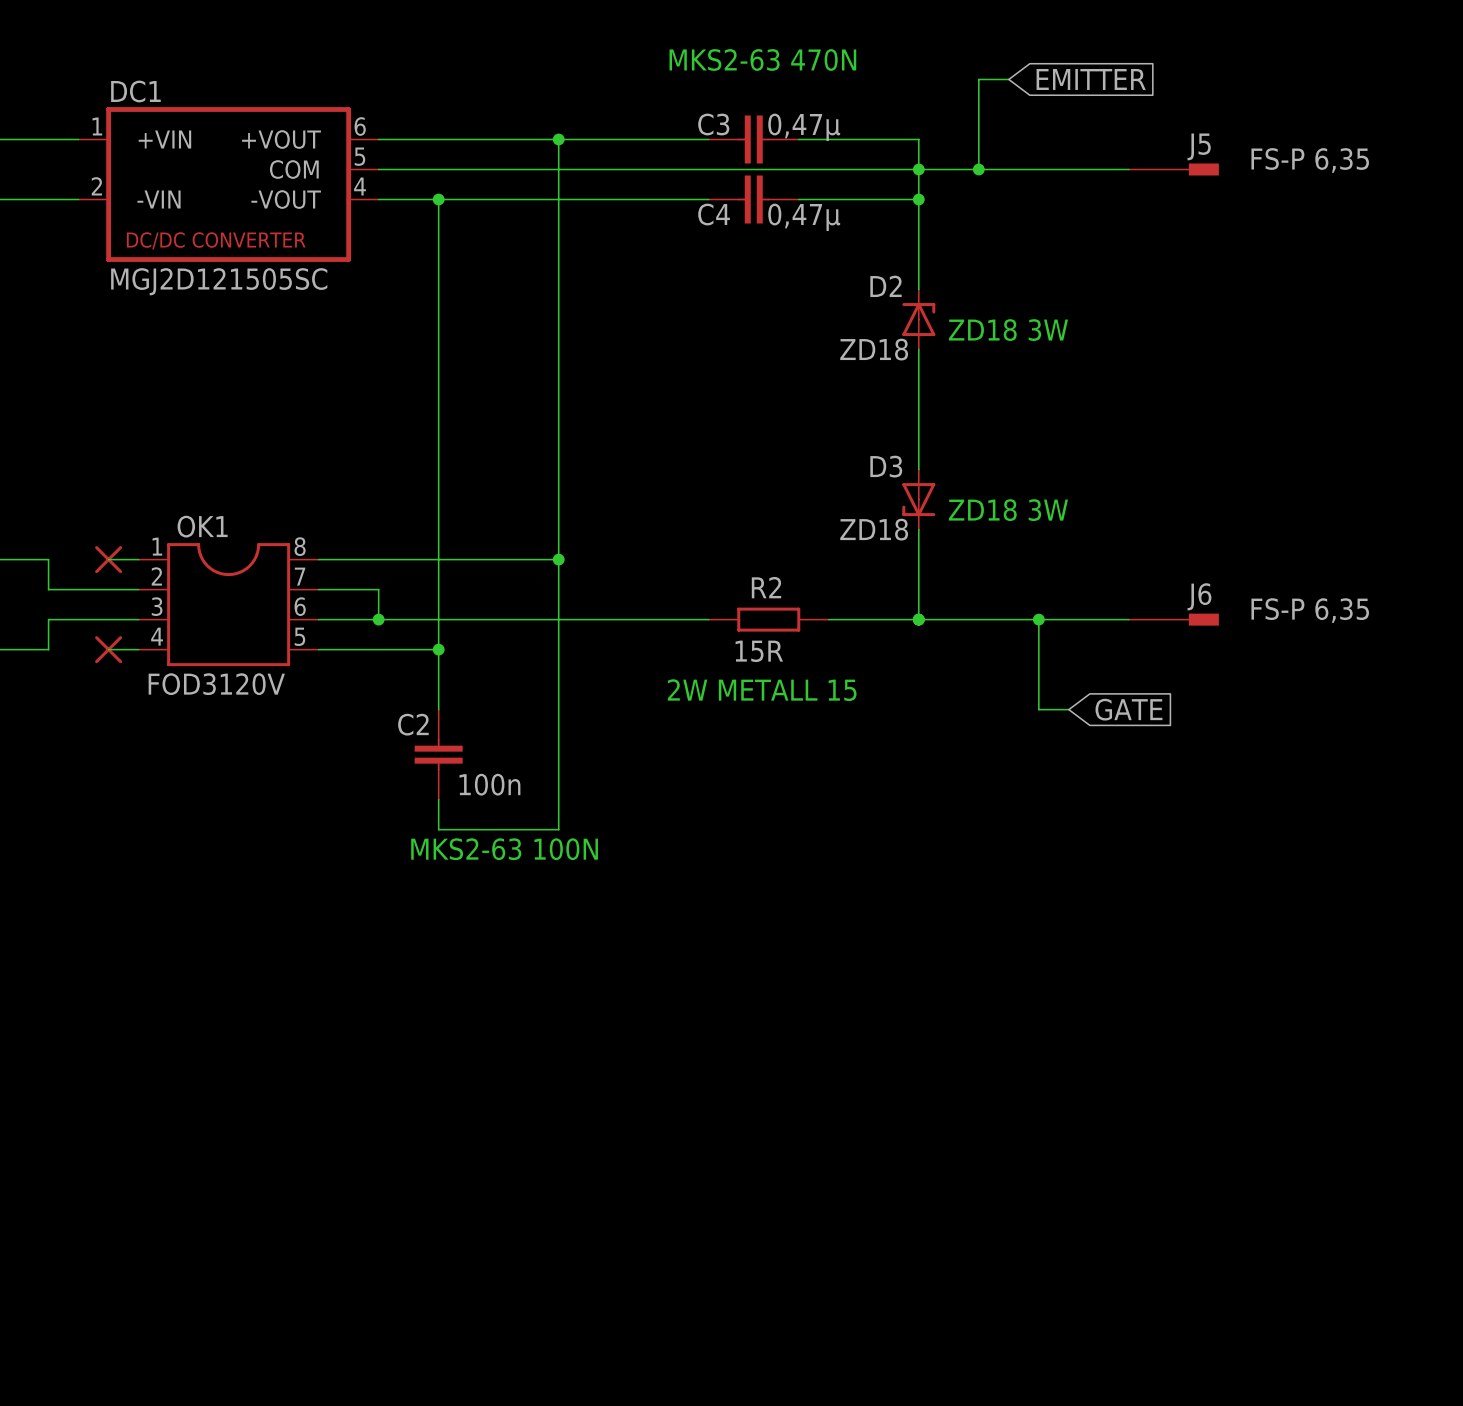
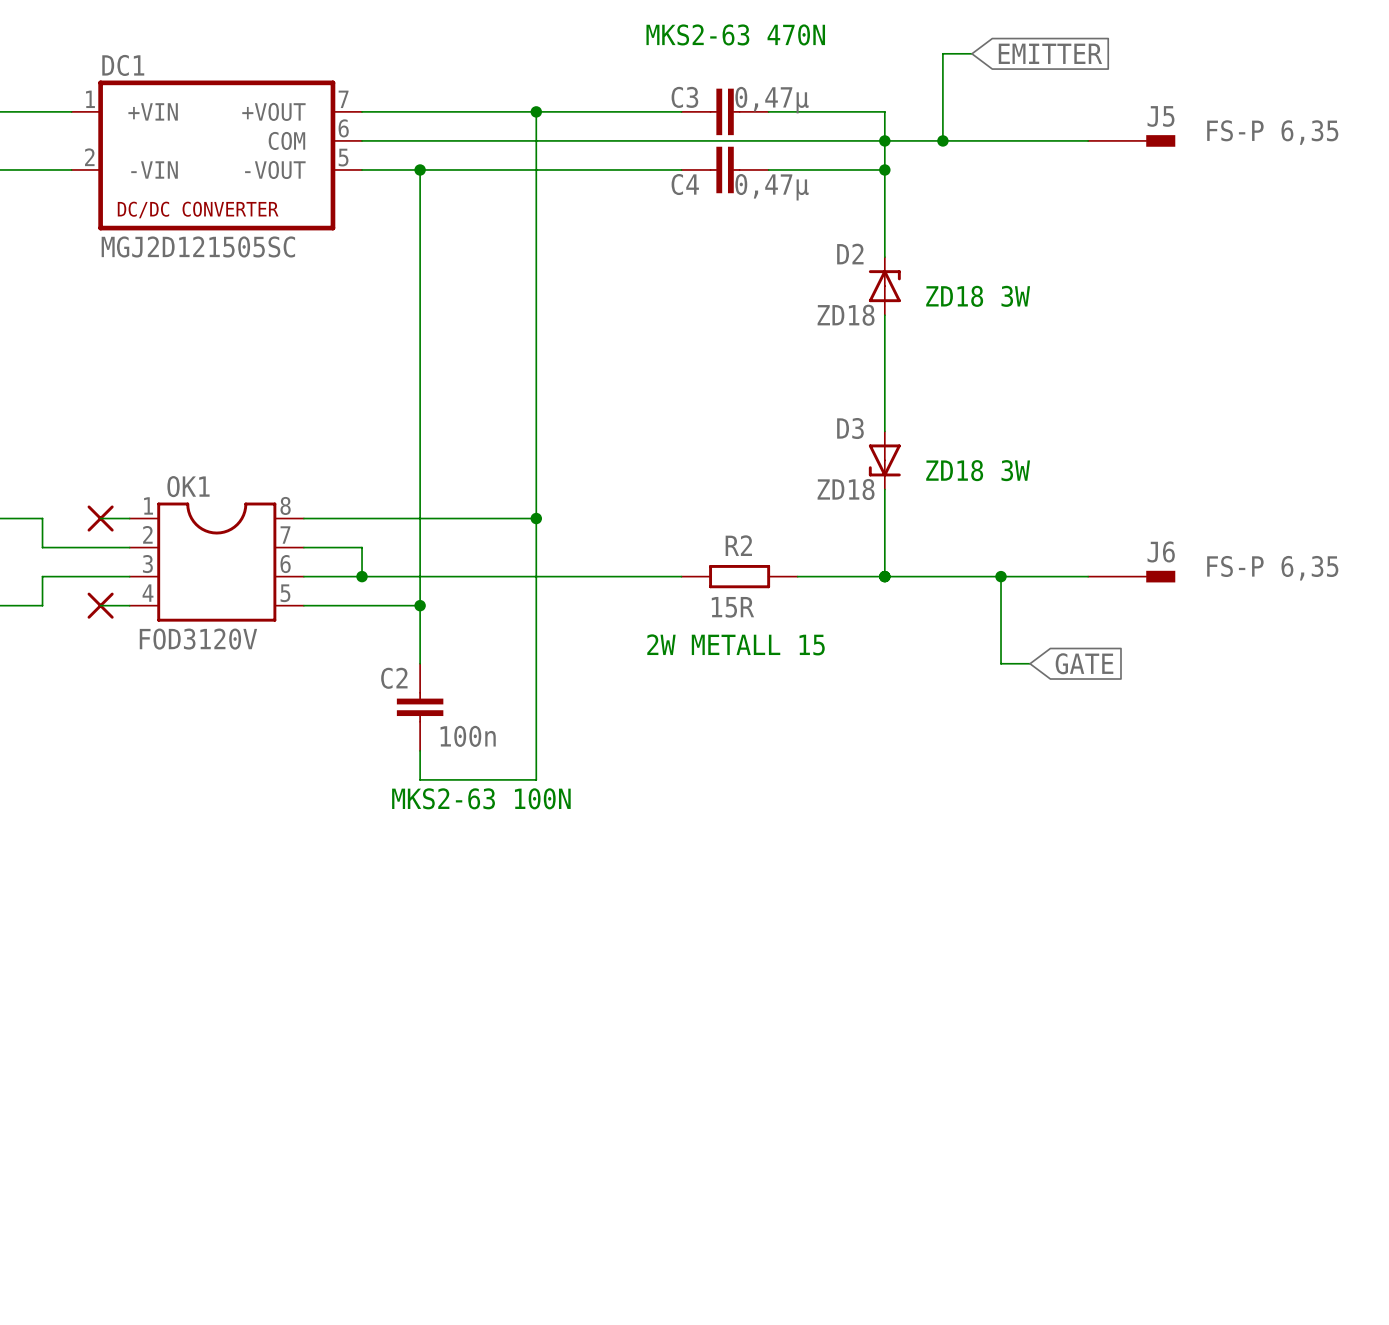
DC1 pin number: 6 (360, 126) -> 7 (343, 99)
DC1 pin number: 5 (359, 156) -> 6 (343, 128)
DC1 pin number: 4 (360, 186) -> 5 (343, 157)

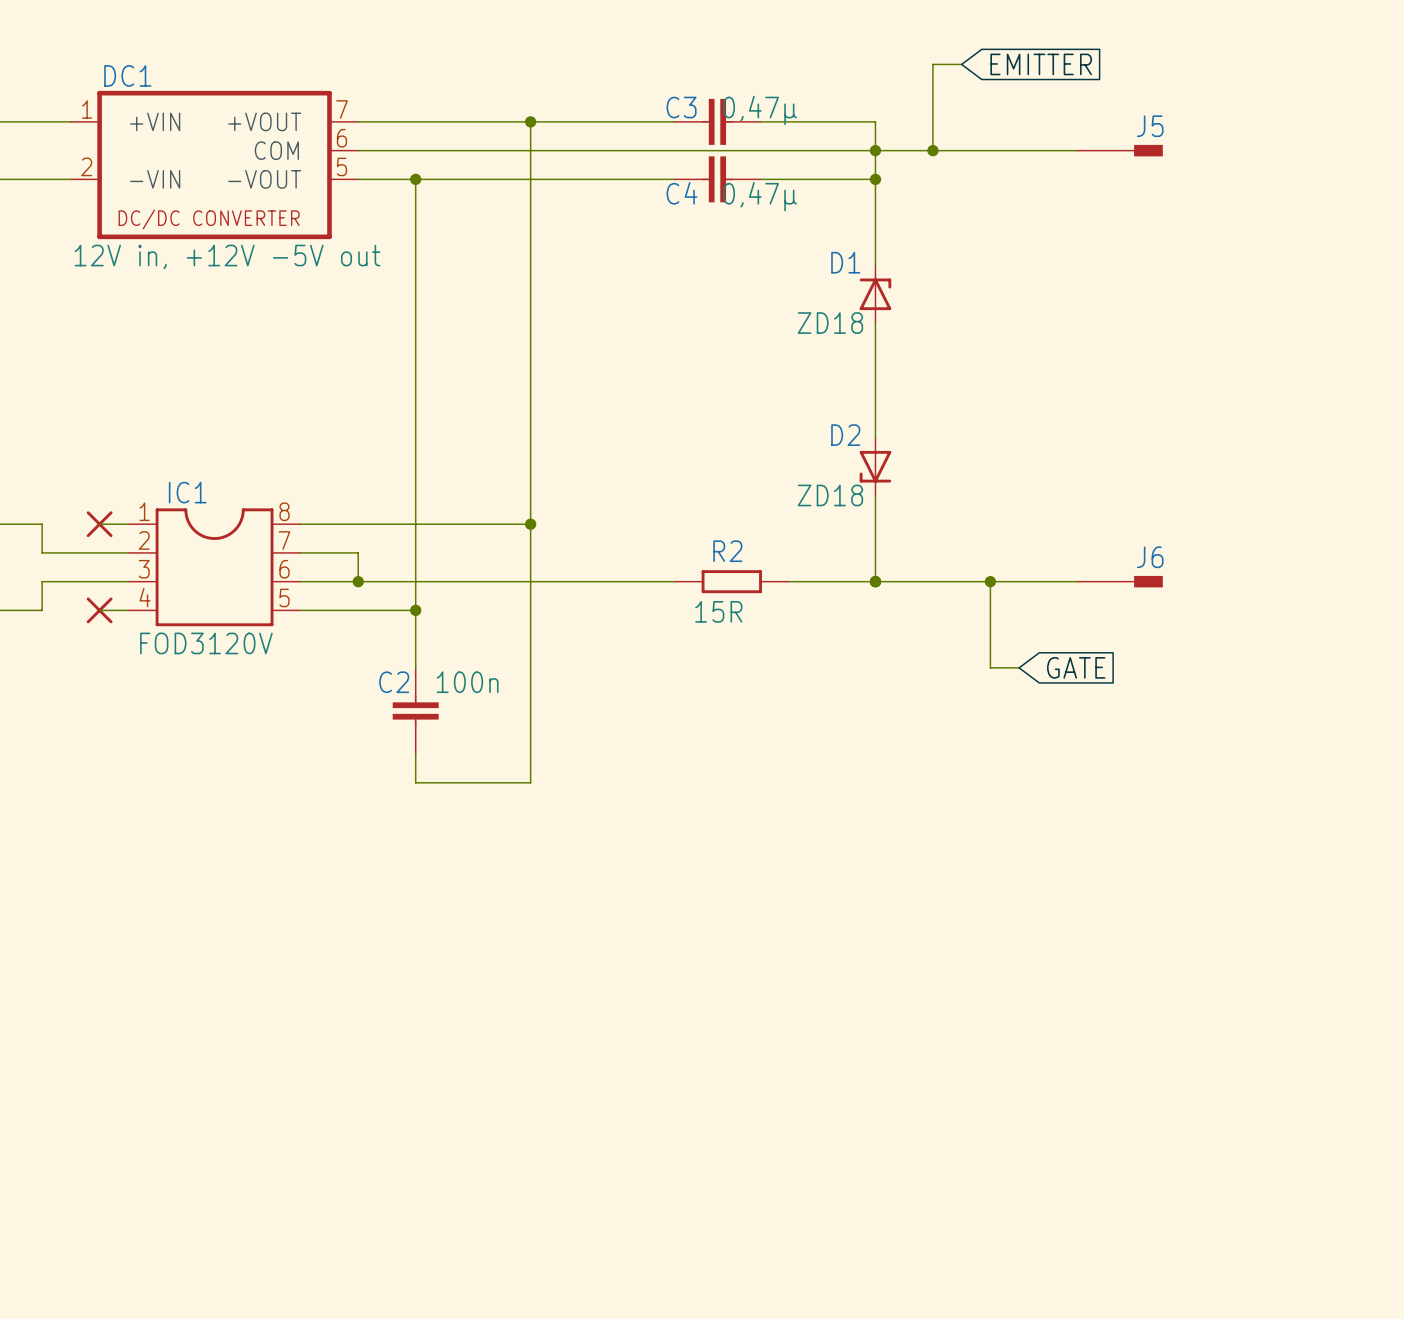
text: MKS2-63 470N (735, 34) -> none
J5 value: FS-P 6,35 (1272, 132) -> none
DC1 value: MGJ2D121505SC (198, 246) -> 12V in, +12V -5V out (227, 256)
D2 name: D2 (850, 254) -> D1 (845, 262)
text: ZD18 3W (978, 296) -> none
D3 name: D3 (850, 428) -> D2 (845, 435)
text: ZD18 3W (978, 470) -> none
OK1 name: OK1 (188, 486) -> IC1 (187, 492)
J6 value: FS-P 6,35 (1272, 568) -> none
text: 2W METALL 15 (736, 644) -> none
C2 value position: 100n (468, 736) -> 100n (467, 682)
text: MKS2-63 100N (481, 798) -> none

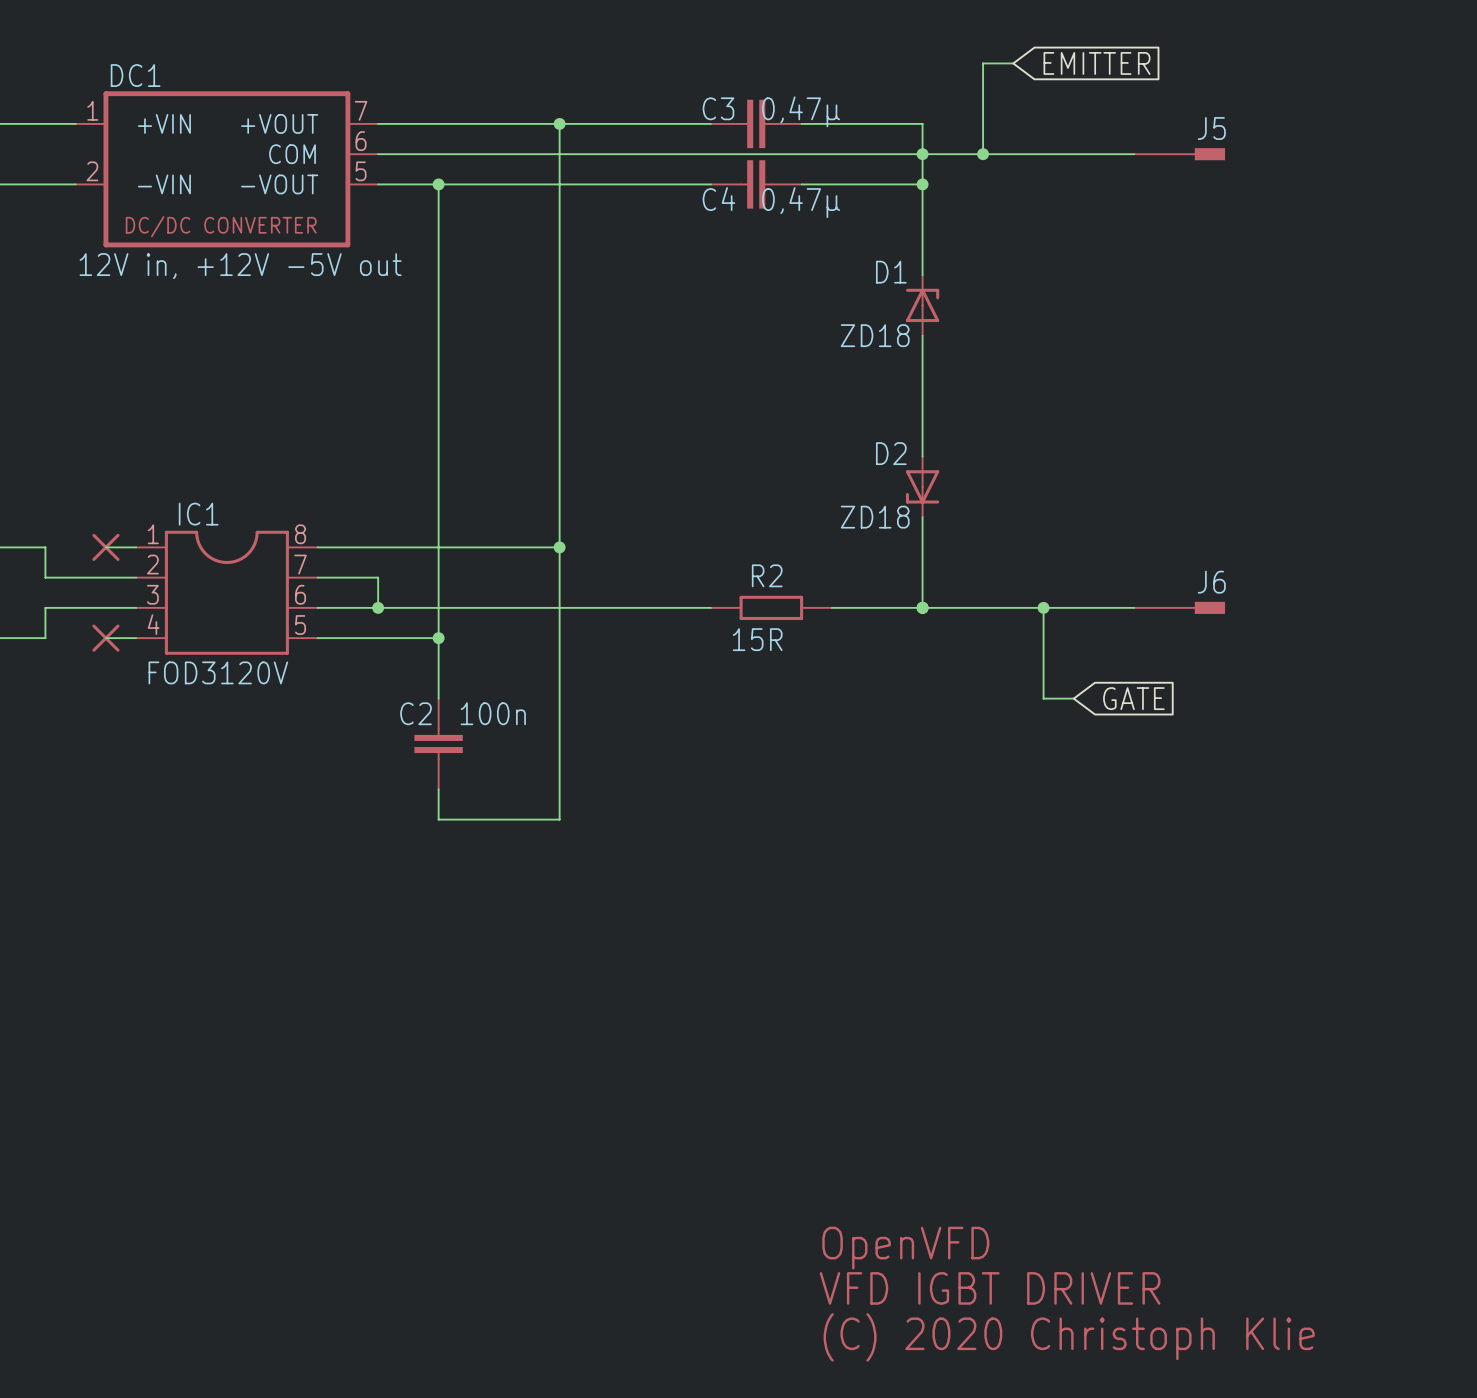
text: none -> OpenVFD (905, 1248)
text: none -> VFD IGBT DRIVER (990, 1288)
text: none -> (C) 2020 Christoph Klie (1069, 1337)

